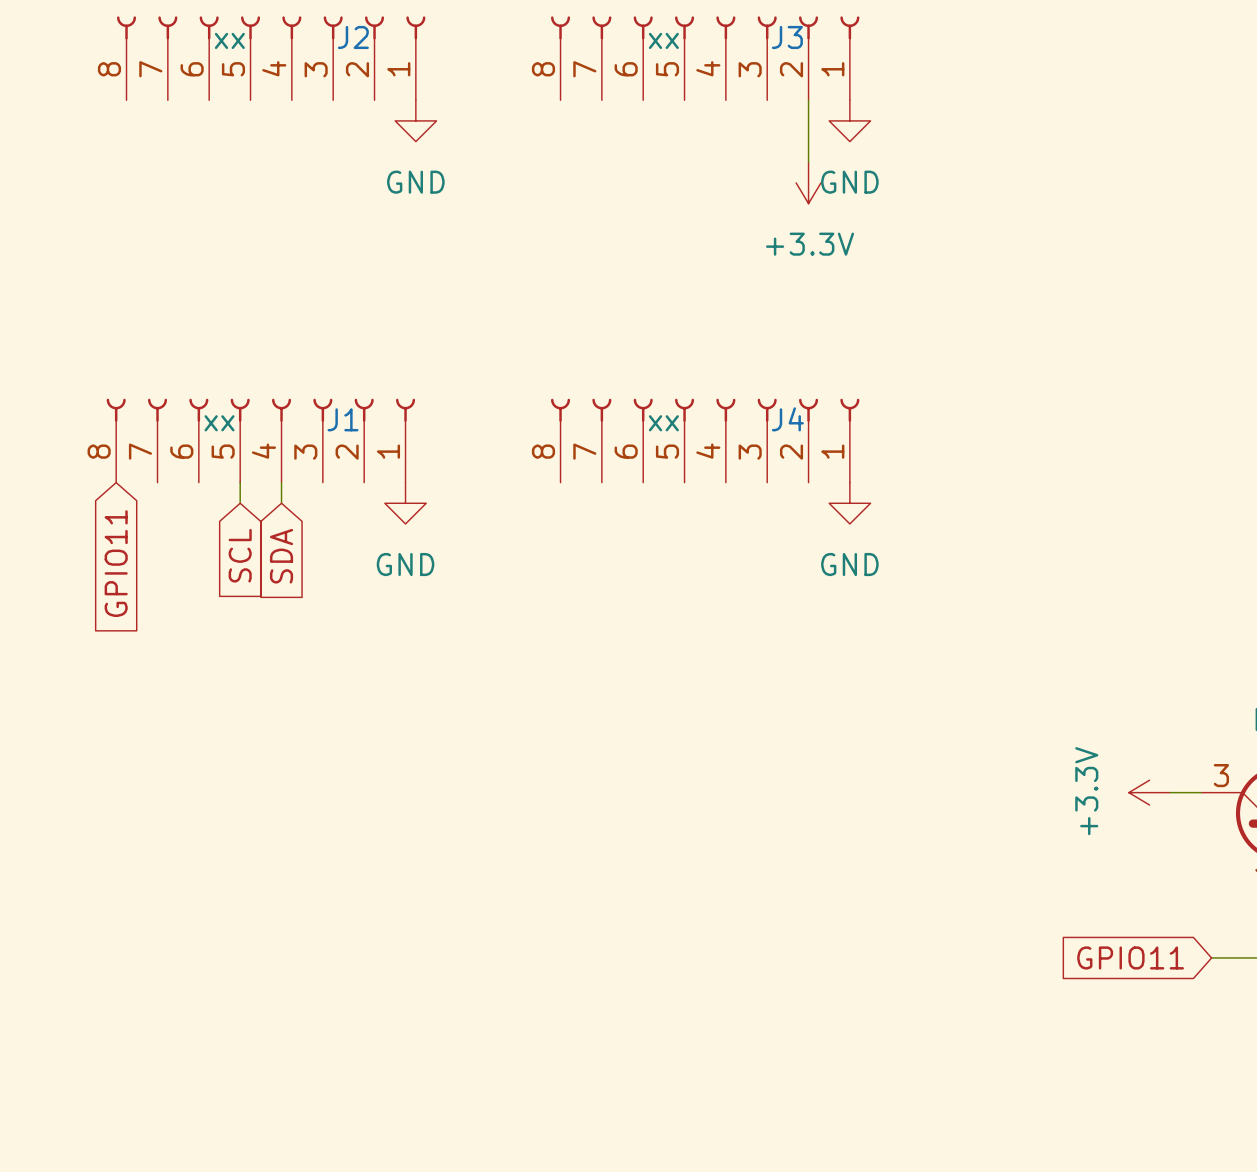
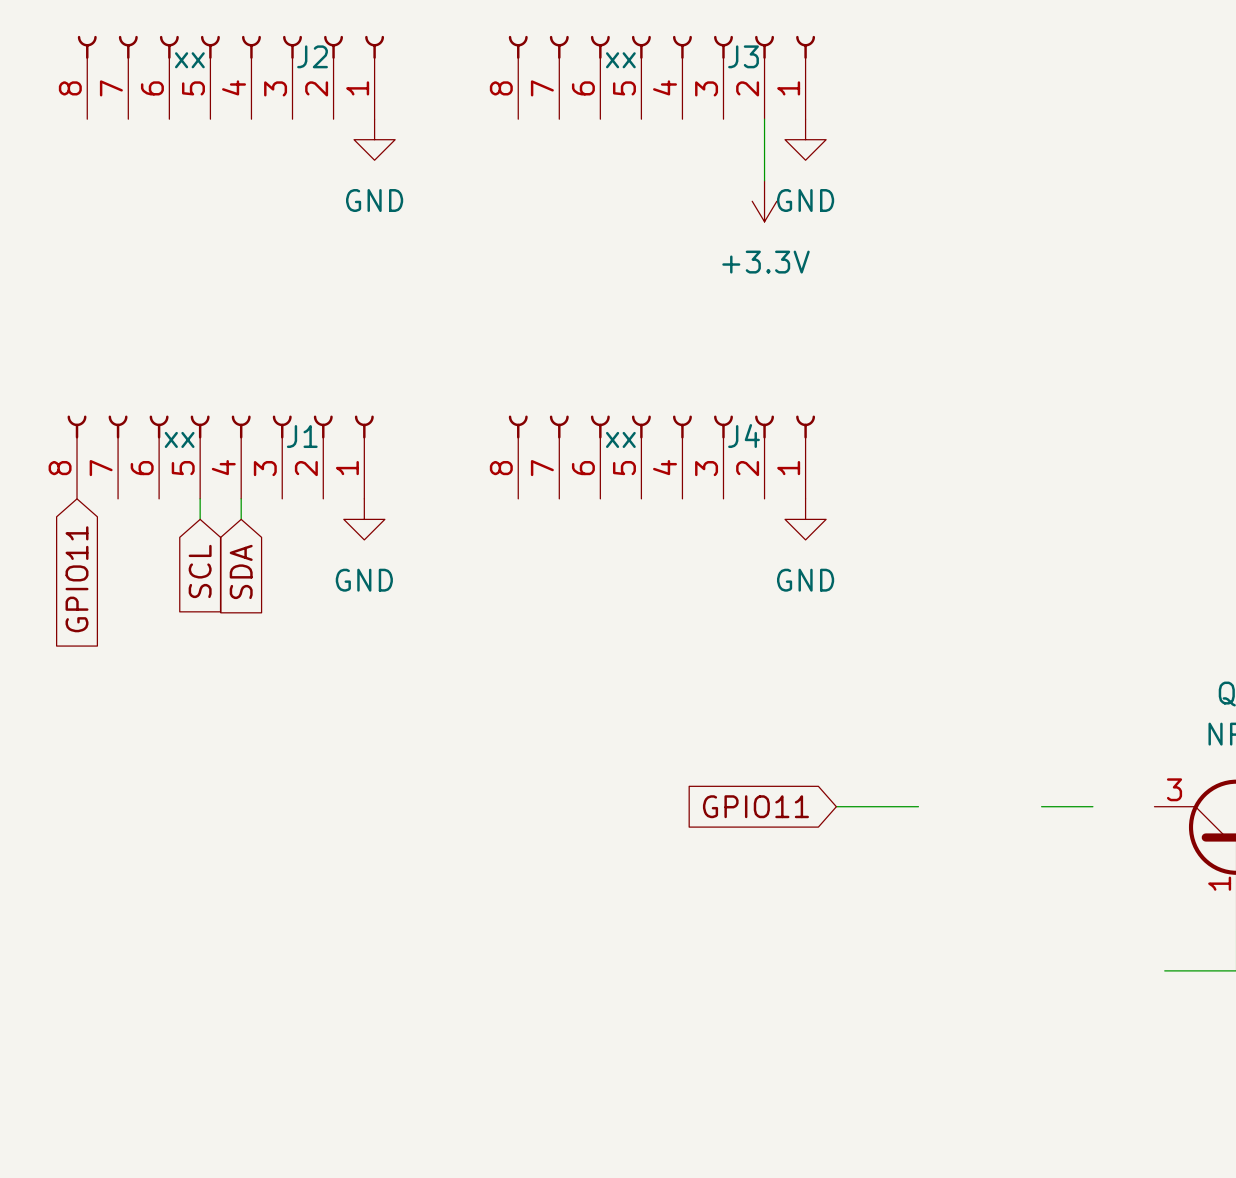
wire: none -> (836, 806) (918, 806)
wire: none -> (1041, 806) (1092, 806)
power symbol: +3.3V (1149, 792) -> none
wire: (1170, 792) (1201, 792) -> none
global label position: GPIO11 (1130, 957) -> GPIO11 (755, 806)

